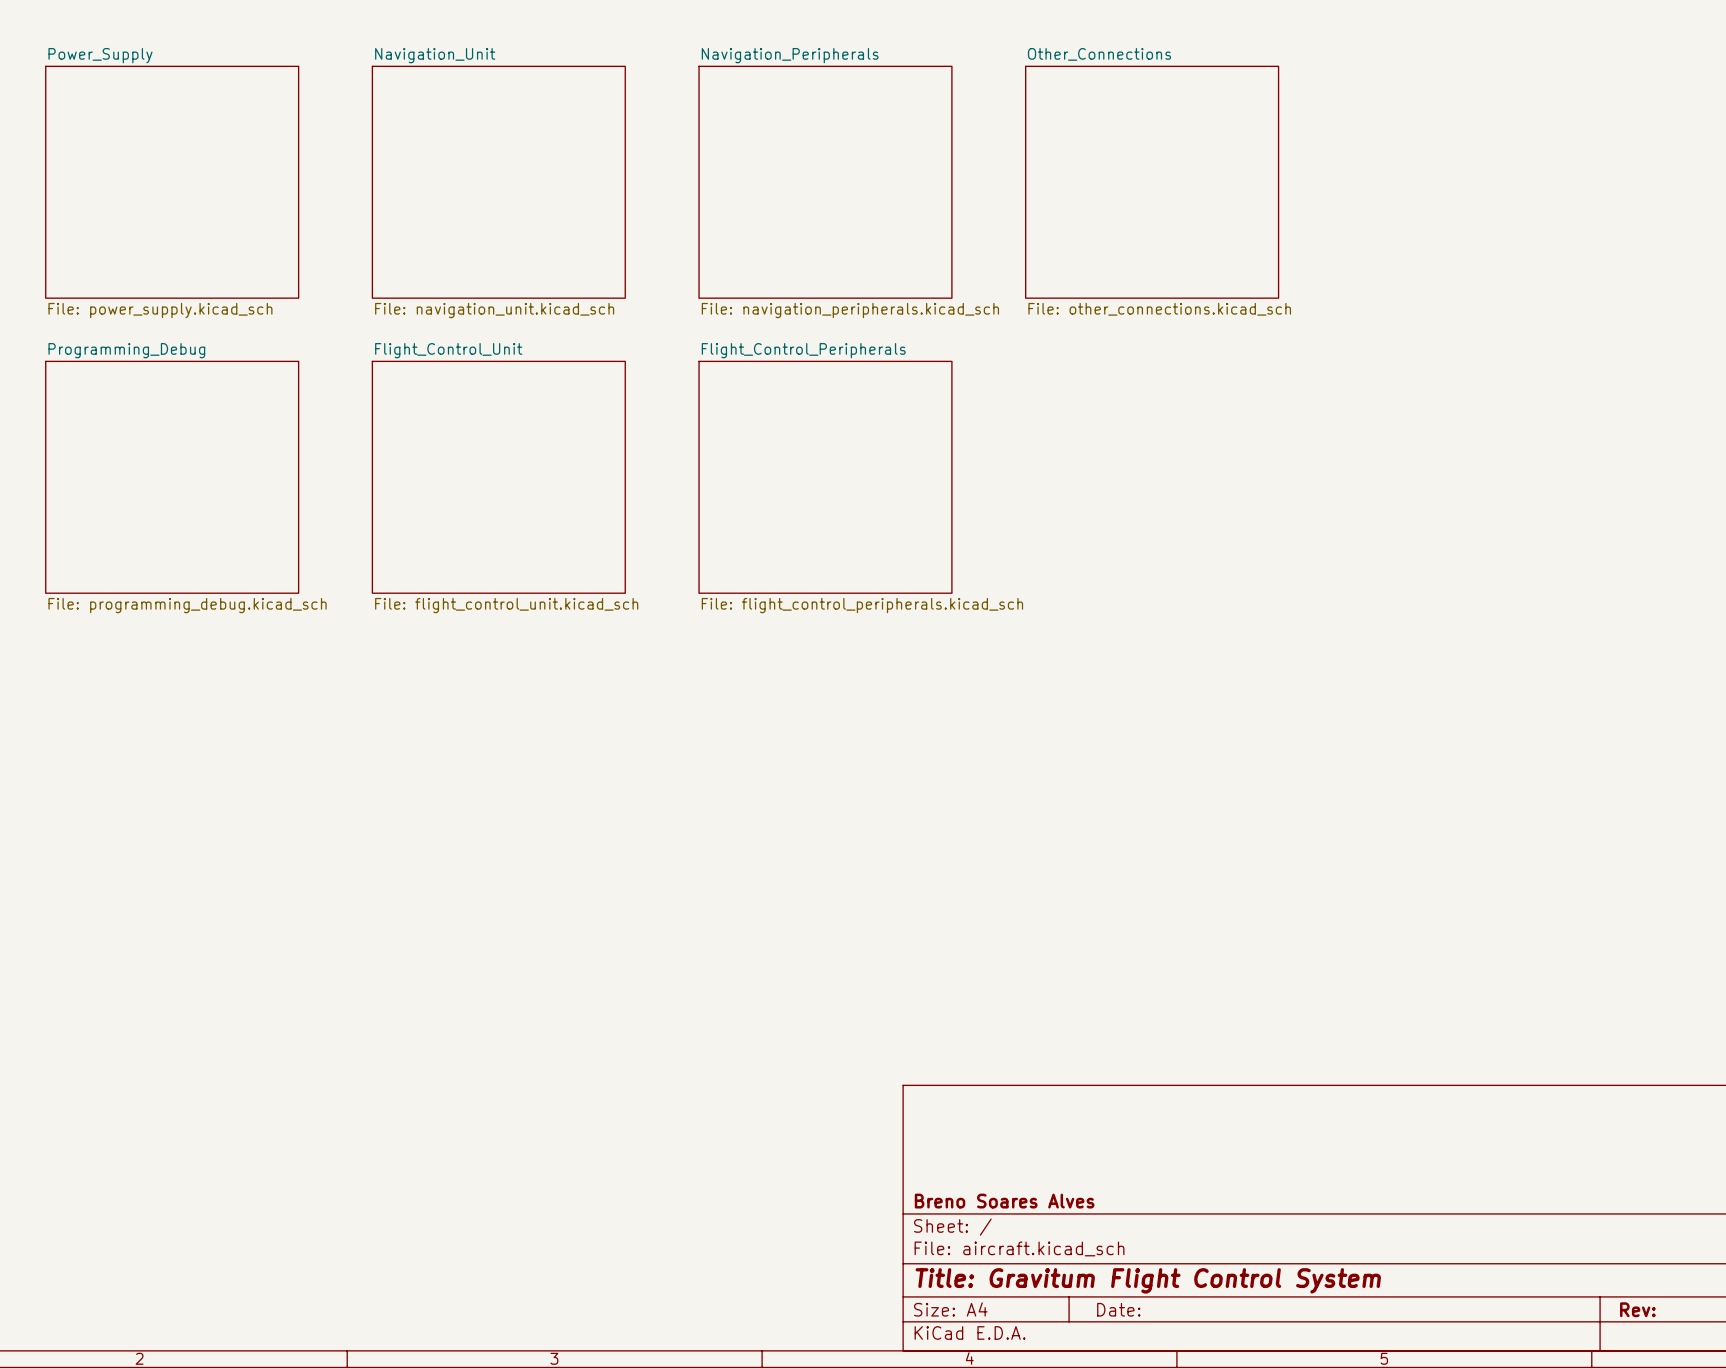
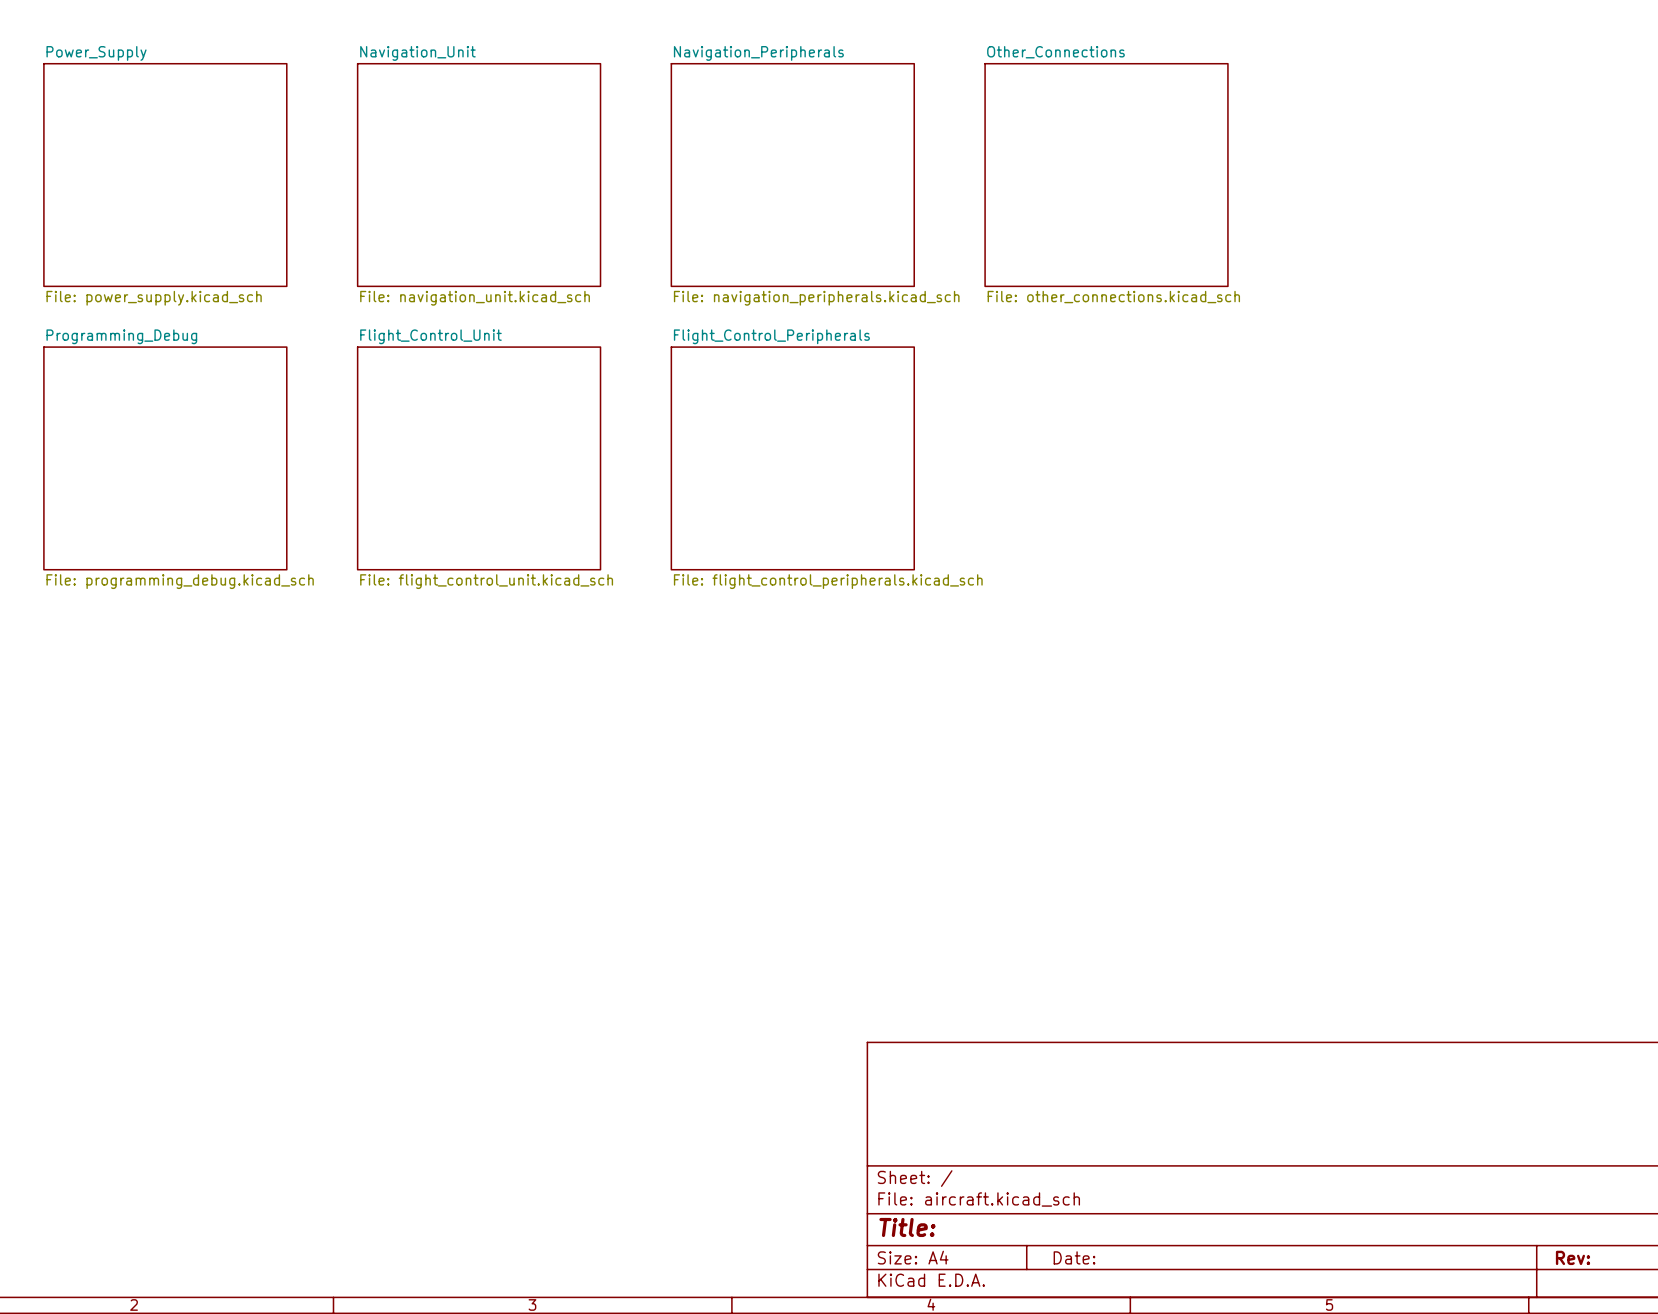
title block: Breno Soares Alves (1004, 1201) -> none
title block: Title: Gravitum Flight Control System (1148, 1280) -> Title: (907, 1227)

